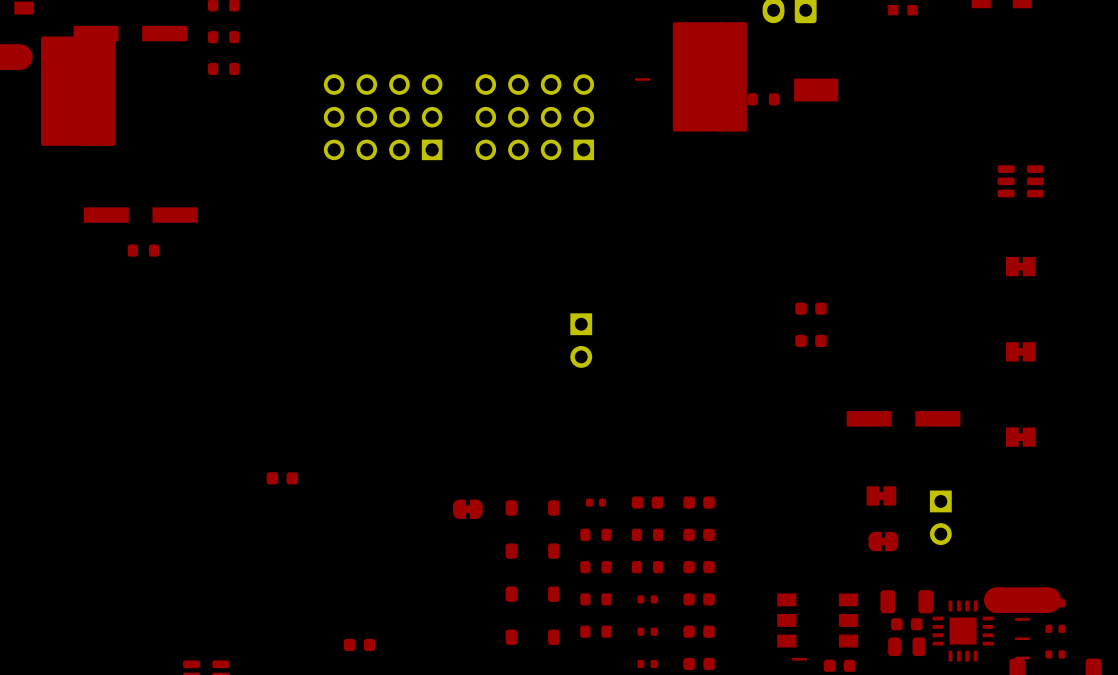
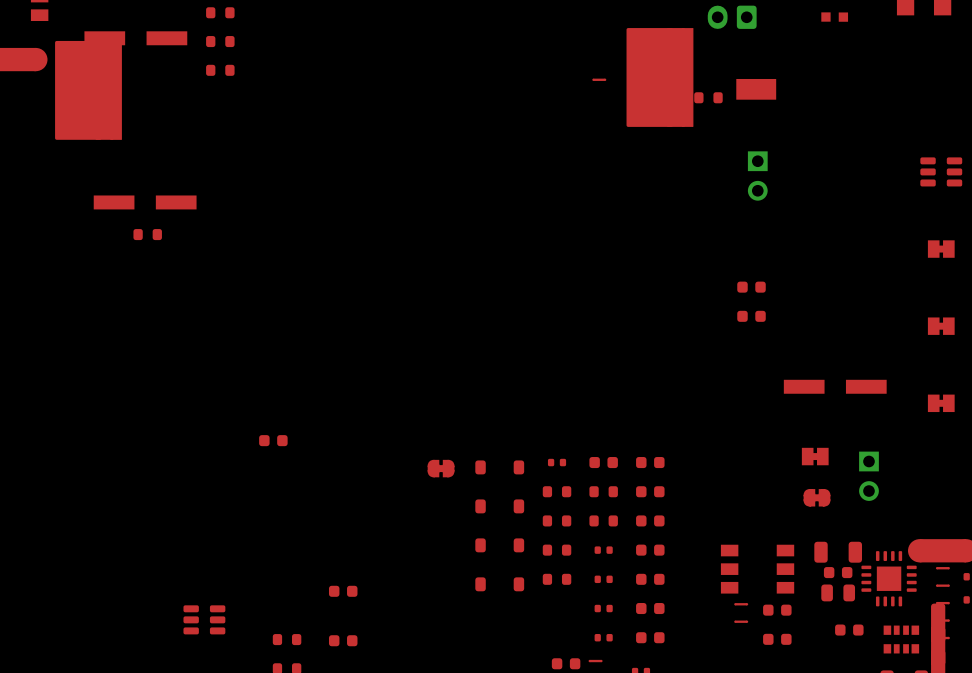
part: (383, 117) -> none
part: (534, 117) -> none
part position: (581, 340) -> (757, 175)

